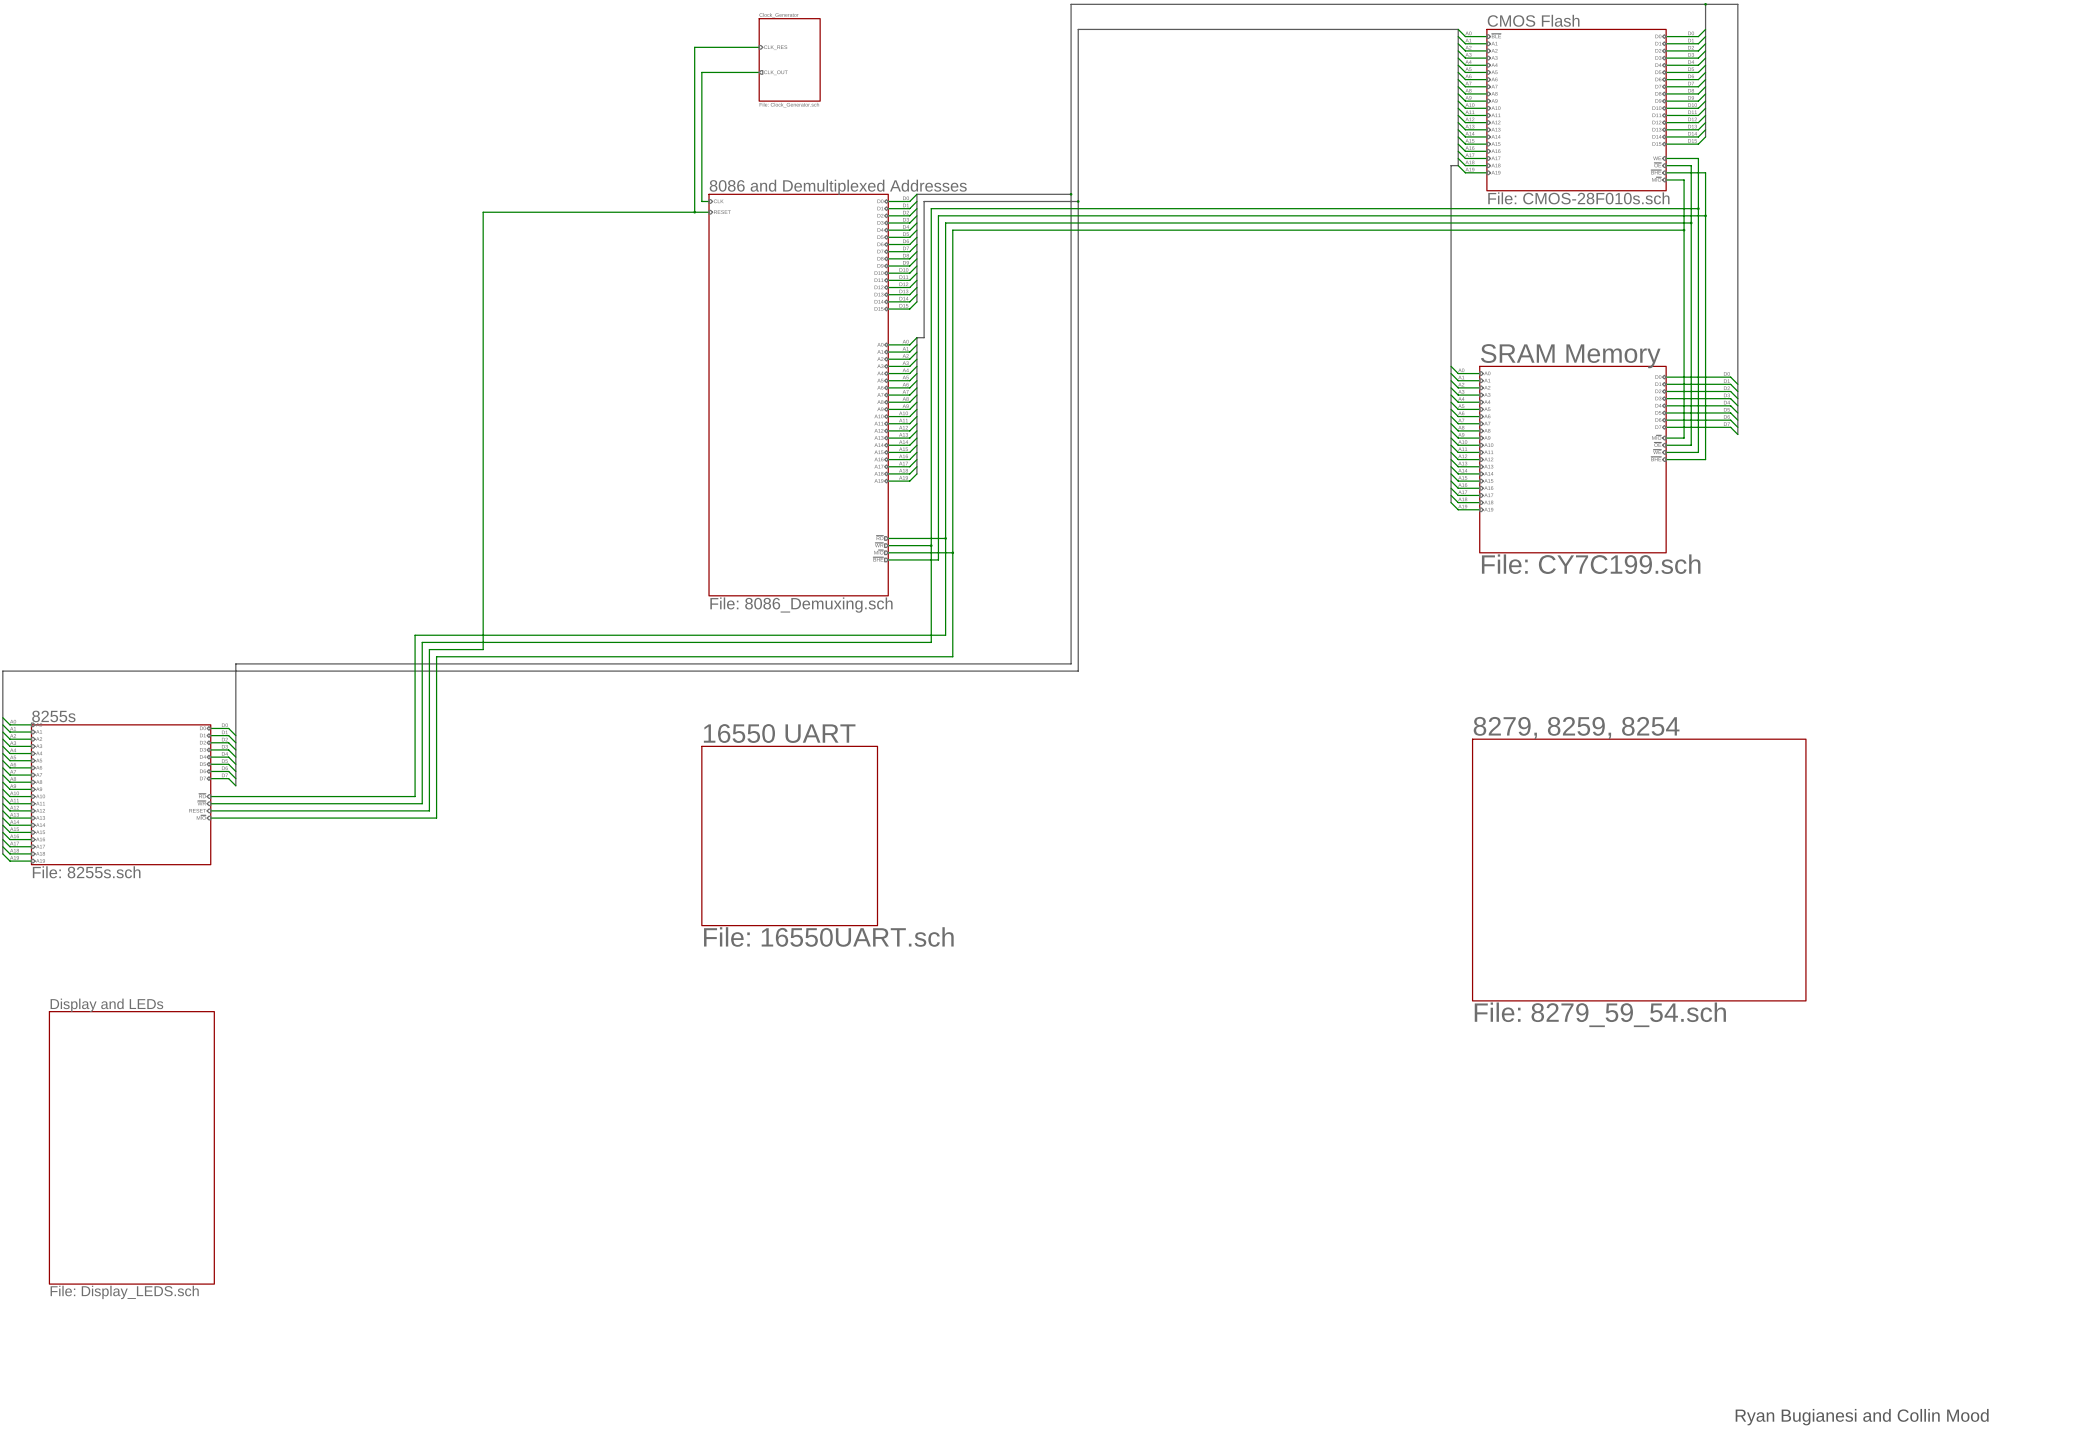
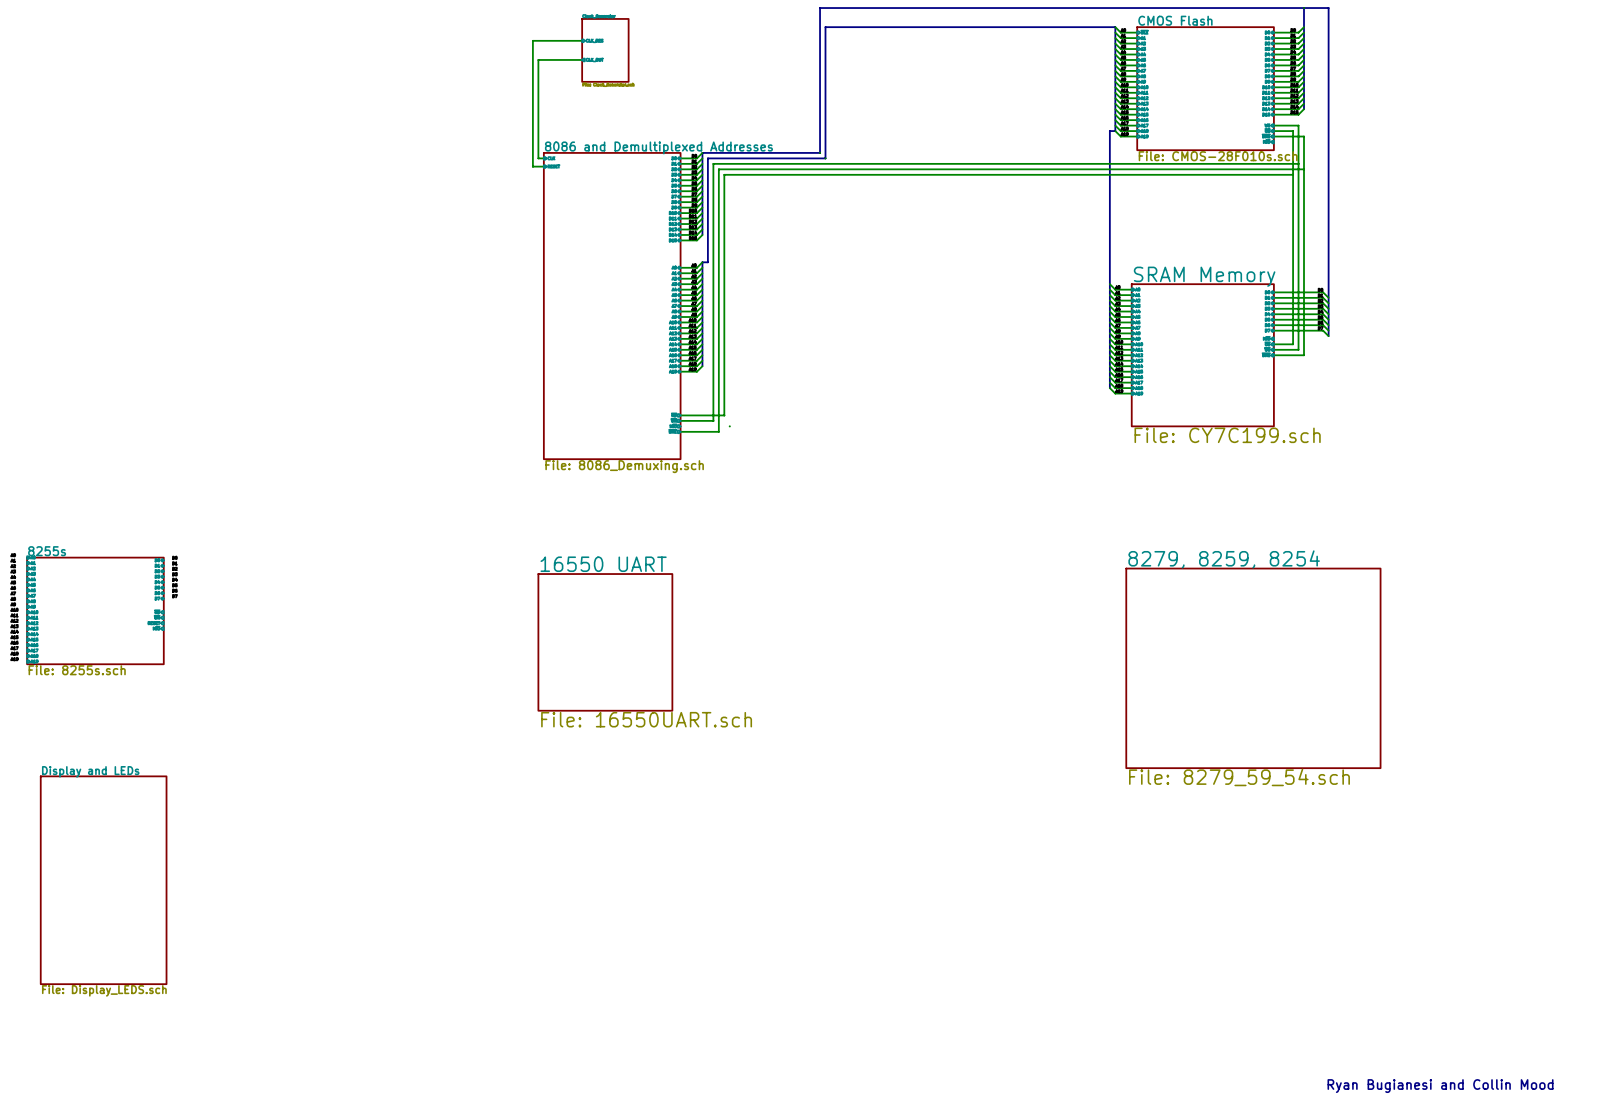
wire: (1666, 179) (1684, 179) (1684, 438) (1666, 438) -> none
bus: (1071, 194) (1071, 663) (235, 663) (235, 785) -> none
bus: (1078, 201) (1078, 671) (2, 671) (2, 853) -> none
wire: (694, 212) (483, 212) (483, 649) (429, 649) (429, 810) (210, 810) -> none
wire: (1684, 230) (952, 230) (952, 656) (436, 656) (436, 818) (210, 818) -> none
wire: (945, 538) (945, 635) (415, 635) (415, 796) (210, 796) -> none
wire: (931, 545) (931, 642) (422, 642) (422, 803) (210, 803) -> none
wire: (888, 552) (952, 552) -> none
wire: (2, 717) (9, 724) (31, 724) -> none
wire: (2, 724) (9, 732) (31, 732) -> none
wire: (210, 728) (228, 728) (235, 735) -> none
wire: (2, 732) (9, 739) (31, 739) -> none
wire: (210, 735) (228, 735) (235, 742) -> none
wire: (2, 739) (9, 746) (31, 746) -> none
wire: (210, 742) (228, 742) (235, 749) -> none
wire: (2, 746) (9, 753) (31, 753) -> none
wire: (210, 749) (228, 749) (235, 757) -> none
wire: (2, 753) (9, 760) (31, 760) -> none
wire: (210, 757) (228, 757) (235, 764) -> none
wire: (2, 760) (9, 767) (31, 767) -> none
wire: (210, 764) (228, 764) (235, 771) -> none
wire: (2, 767) (9, 775) (31, 775) -> none
wire: (210, 771) (228, 771) (235, 778) -> none
wire: (2, 775) (9, 782) (31, 782) -> none
wire: (210, 778) (228, 778) (235, 785) -> none
wire: (2, 782) (9, 789) (31, 789) -> none
wire: (2, 789) (9, 796) (31, 796) -> none
wire: (2, 796) (9, 803) (31, 803) -> none
wire: (2, 803) (9, 810) (31, 810) -> none
wire: (2, 810) (9, 818) (31, 818) -> none
wire: (2, 818) (9, 825) (31, 825) -> none
wire: (2, 825) (9, 832) (31, 832) -> none
wire: (2, 832) (9, 839) (31, 839) -> none
wire: (2, 839) (9, 846) (31, 846) -> none
wire: (2, 846) (9, 853) (31, 853) -> none
wire: (2, 853) (9, 861) (31, 861) -> none

